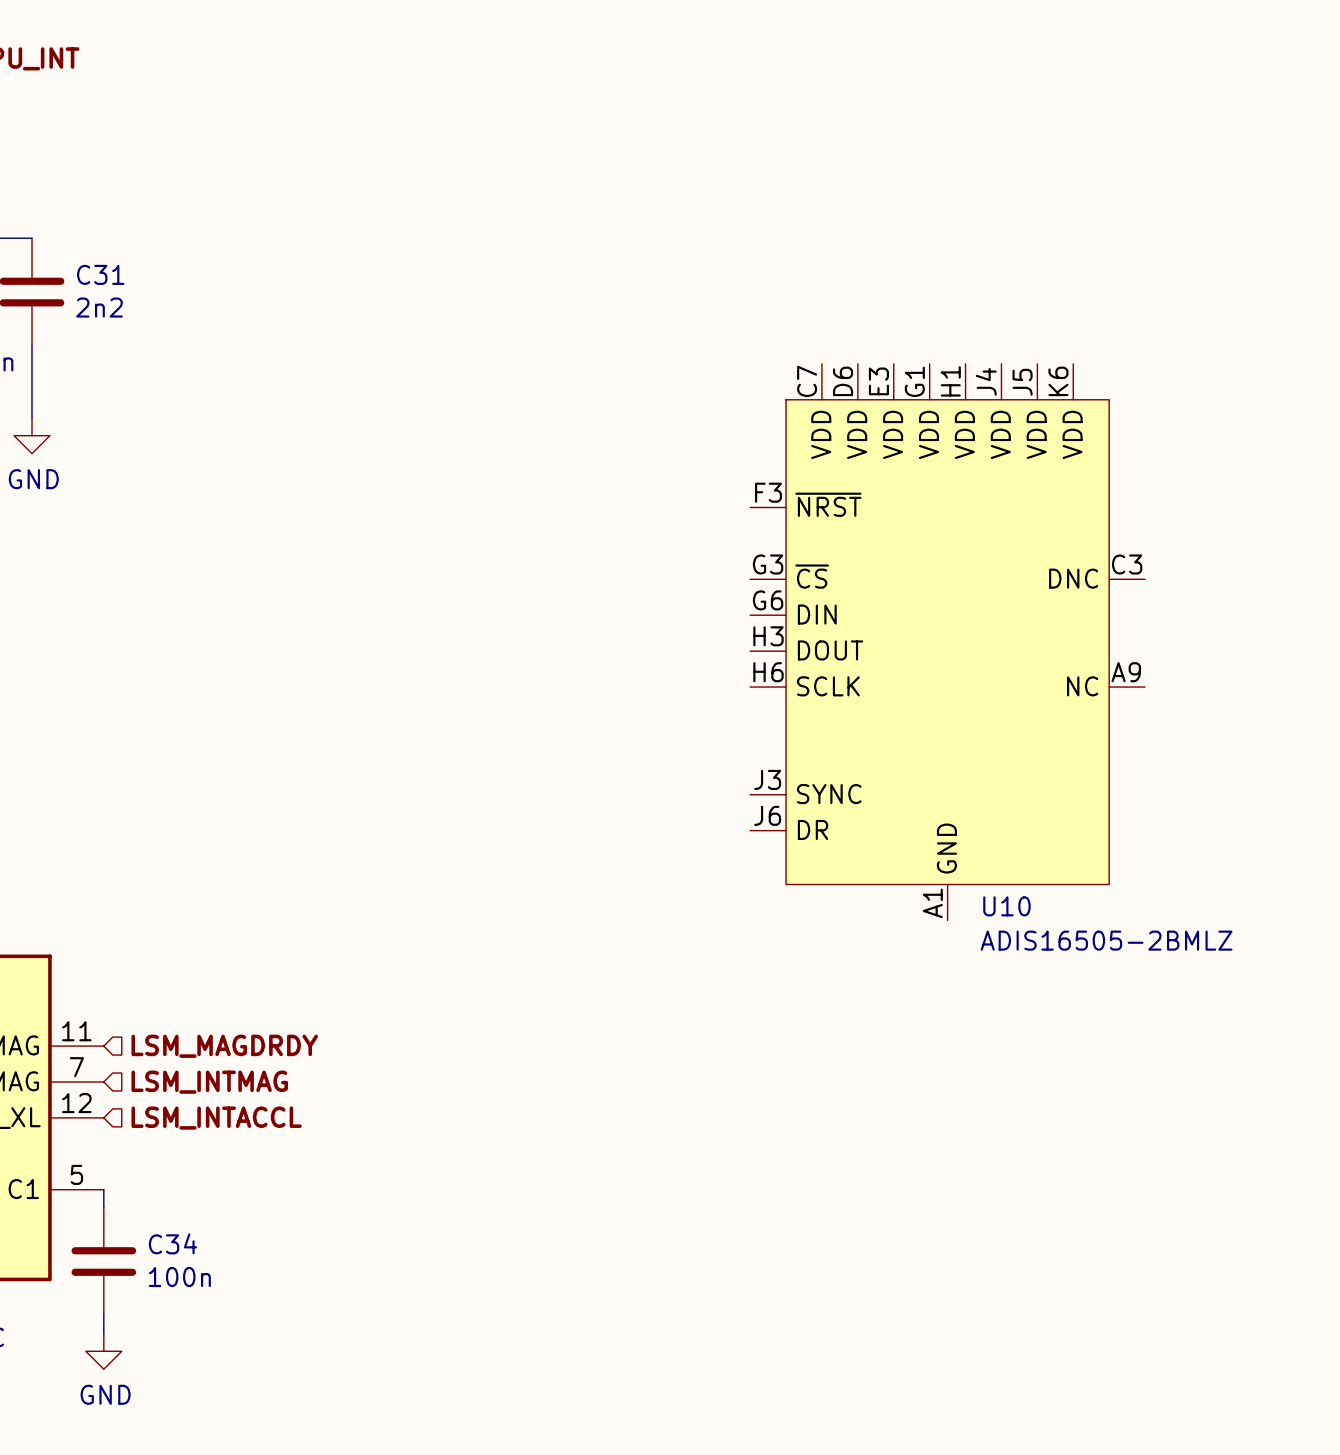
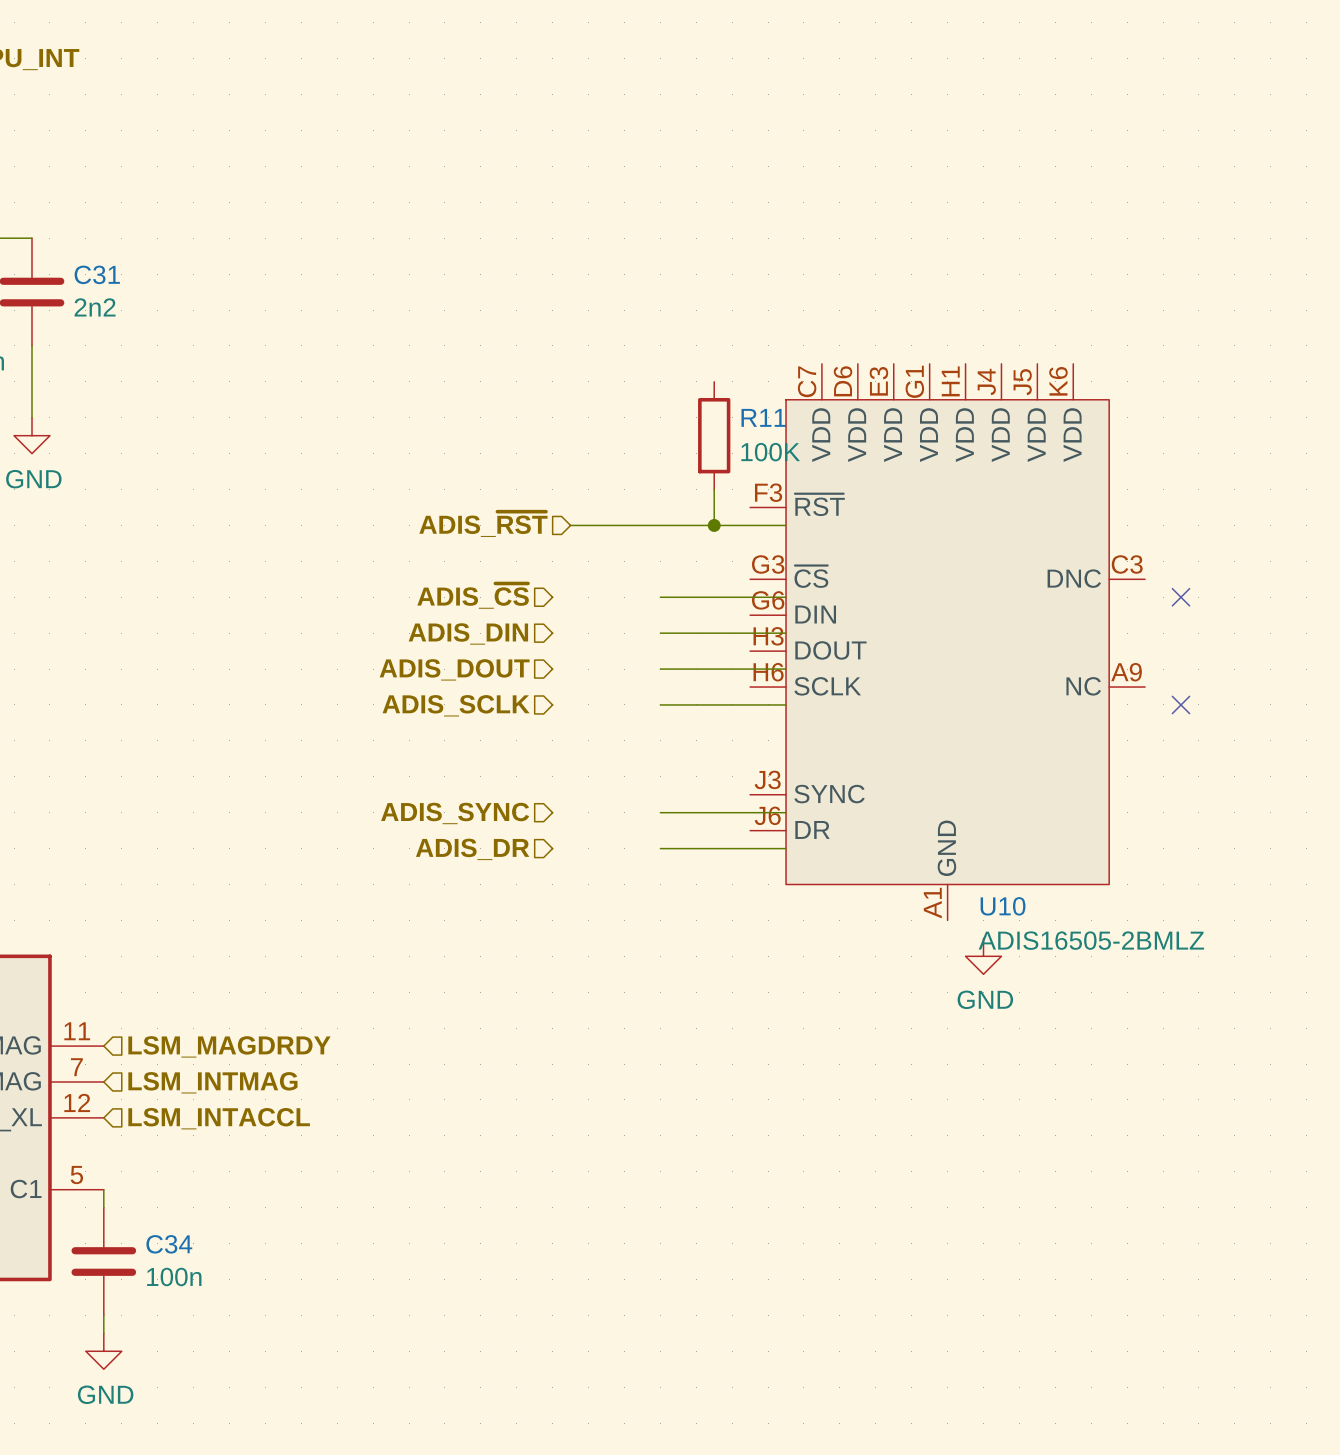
R11: none -> 100K (714, 435)
wire: none -> (714, 489) (714, 525)
U10 pin name: ~{NRST} (828, 504) -> ~{RST} (819, 504)
hierarchical label: none -> ADIS_~{RST} (483, 524)
wire: none -> (570, 525) (786, 525)
junction: none -> (714, 525)
hierarchical label: none -> ADIS_~{CS} (473, 596)
wire: none -> (660, 597) (786, 597)
no-connect mark: none -> (1180, 597)
hierarchical label: none -> ADIS_DIN (468, 633)
wire: none -> (660, 633) (786, 633)
hierarchical label: none -> ADIS_DOUT (454, 669)
wire: none -> (660, 669) (786, 669)
wire: none -> (660, 704) (786, 704)
no-connect mark: none -> (1180, 704)
hierarchical label: none -> ADIS_SCLK (456, 705)
hierarchical label: none -> ADIS_SYNC (455, 813)
wire: none -> (660, 812) (786, 812)
hierarchical label: none -> ADIS_DR (472, 849)
wire: none -> (660, 848) (786, 848)
power symbol: none -> GND (983, 956)

